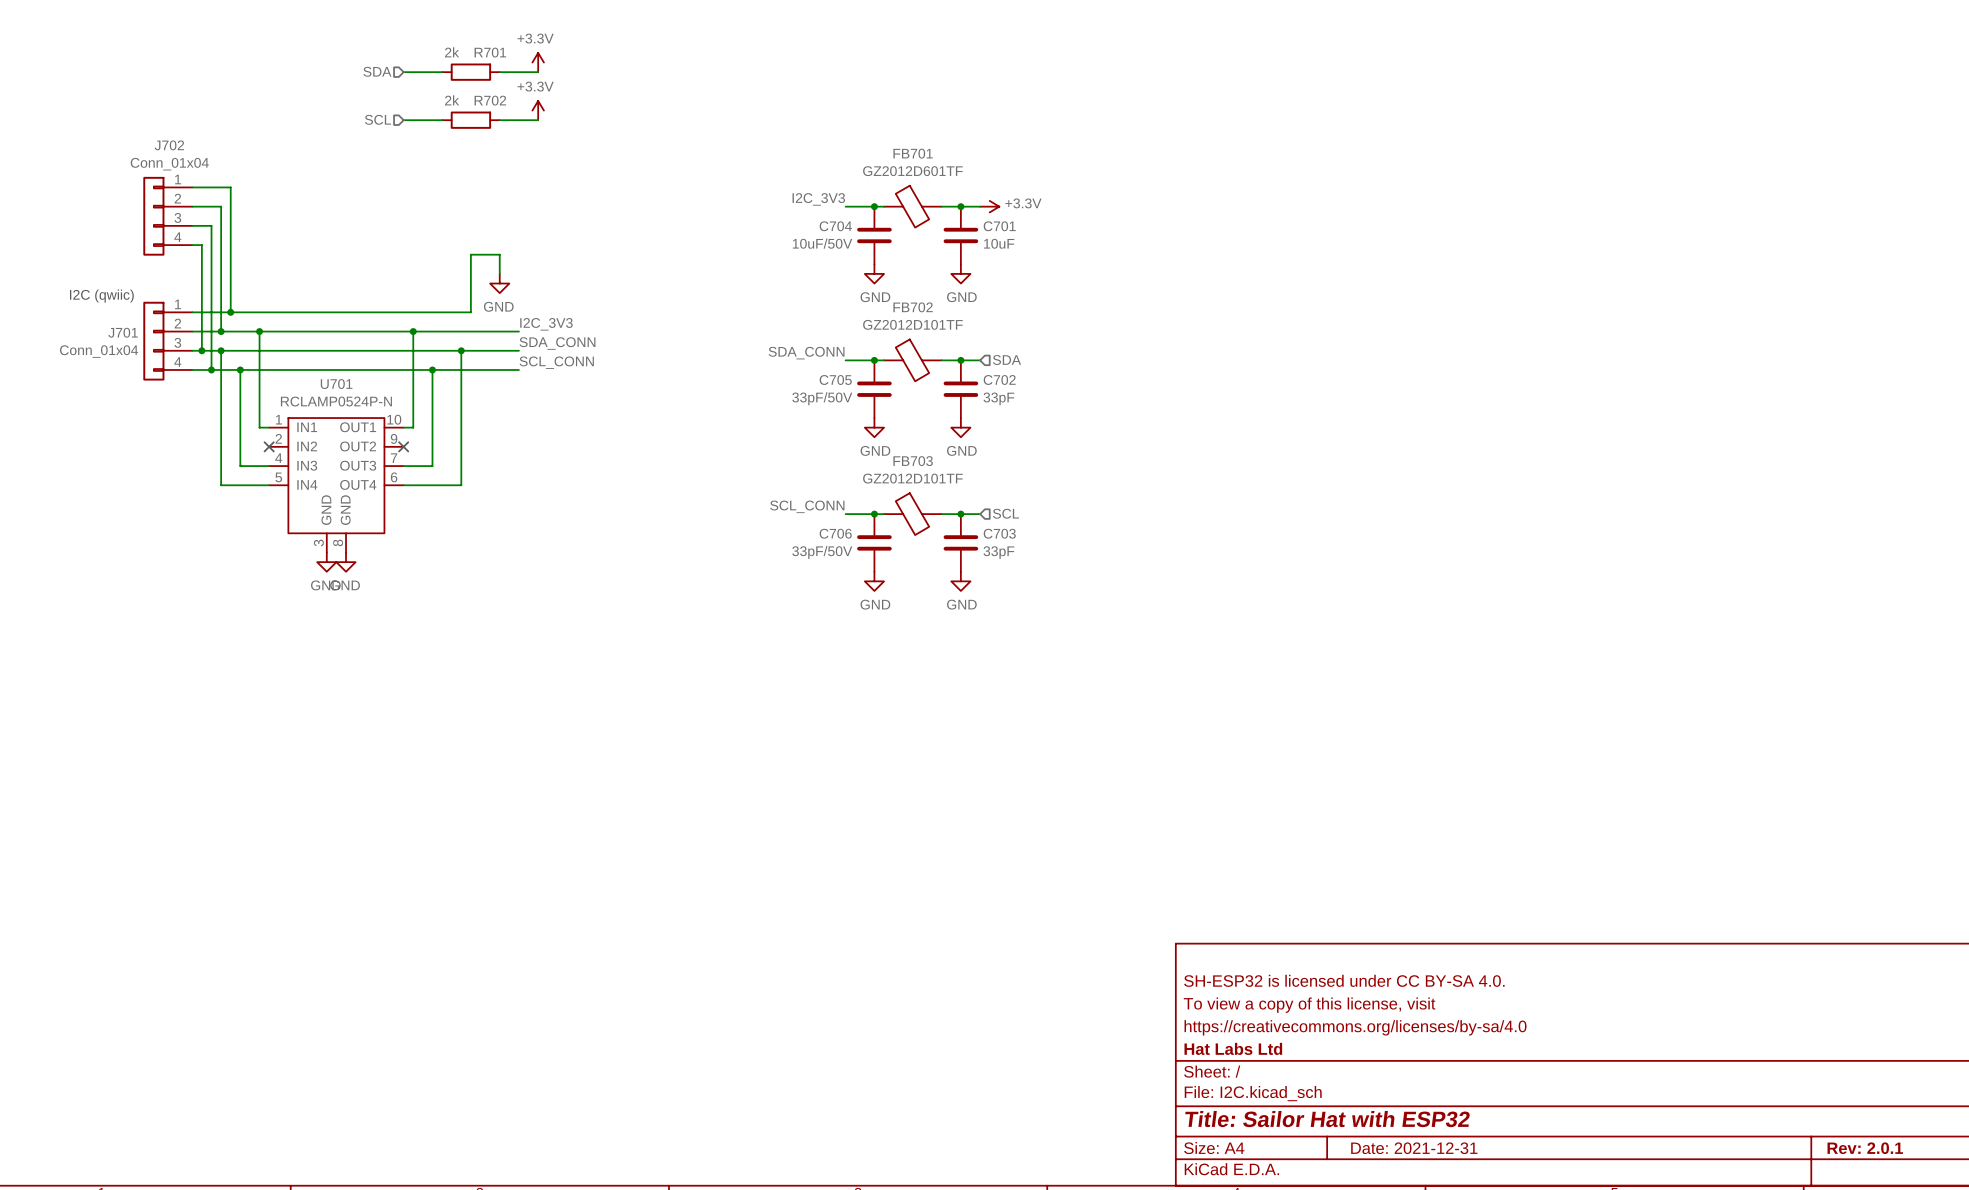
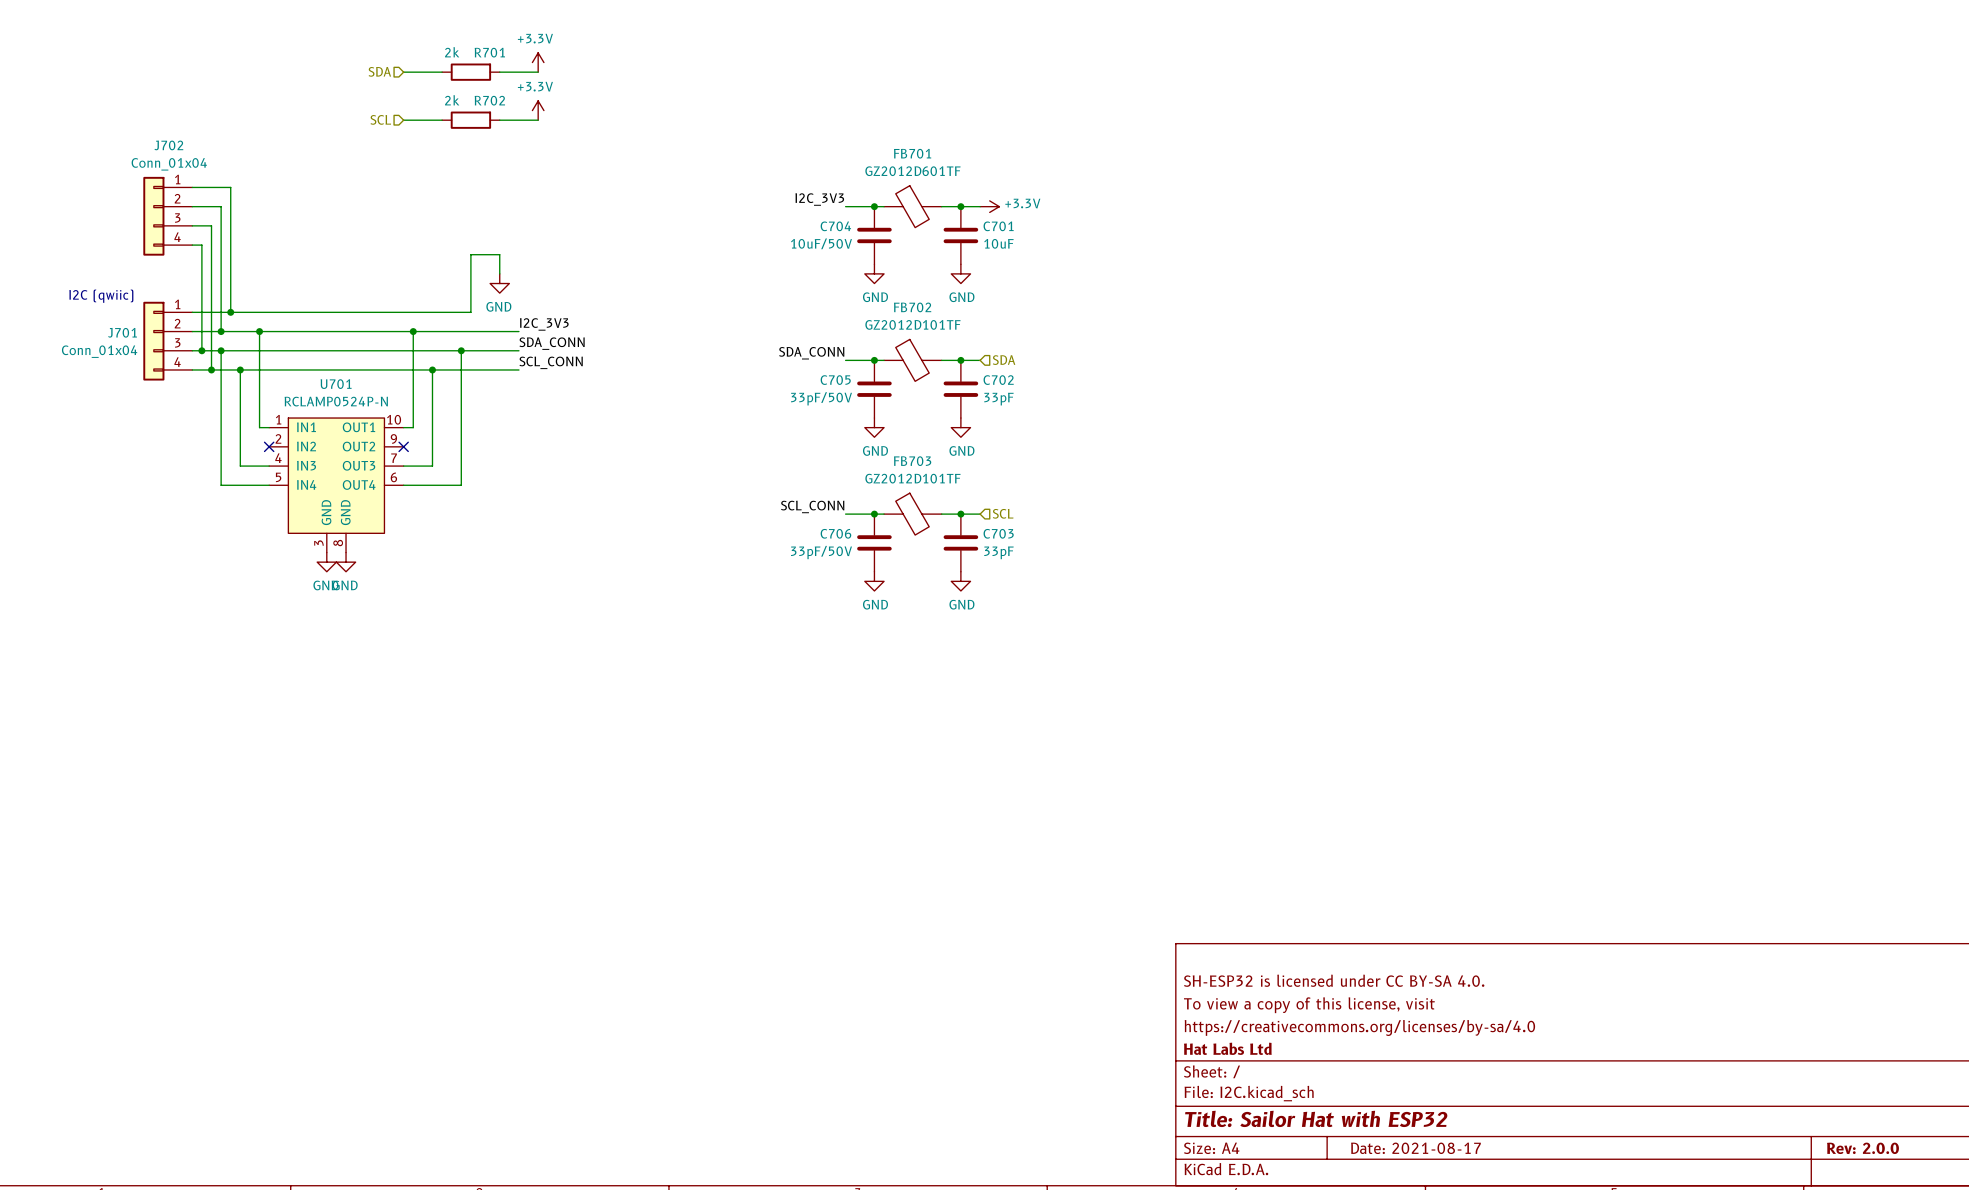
title block: Date: 2021-12-31 (1414, 1148) -> Date: 2021-08-17 (1415, 1148)
title block: Rev: 2.0.1 (1865, 1148) -> Rev: 2.0.0 (1862, 1148)

